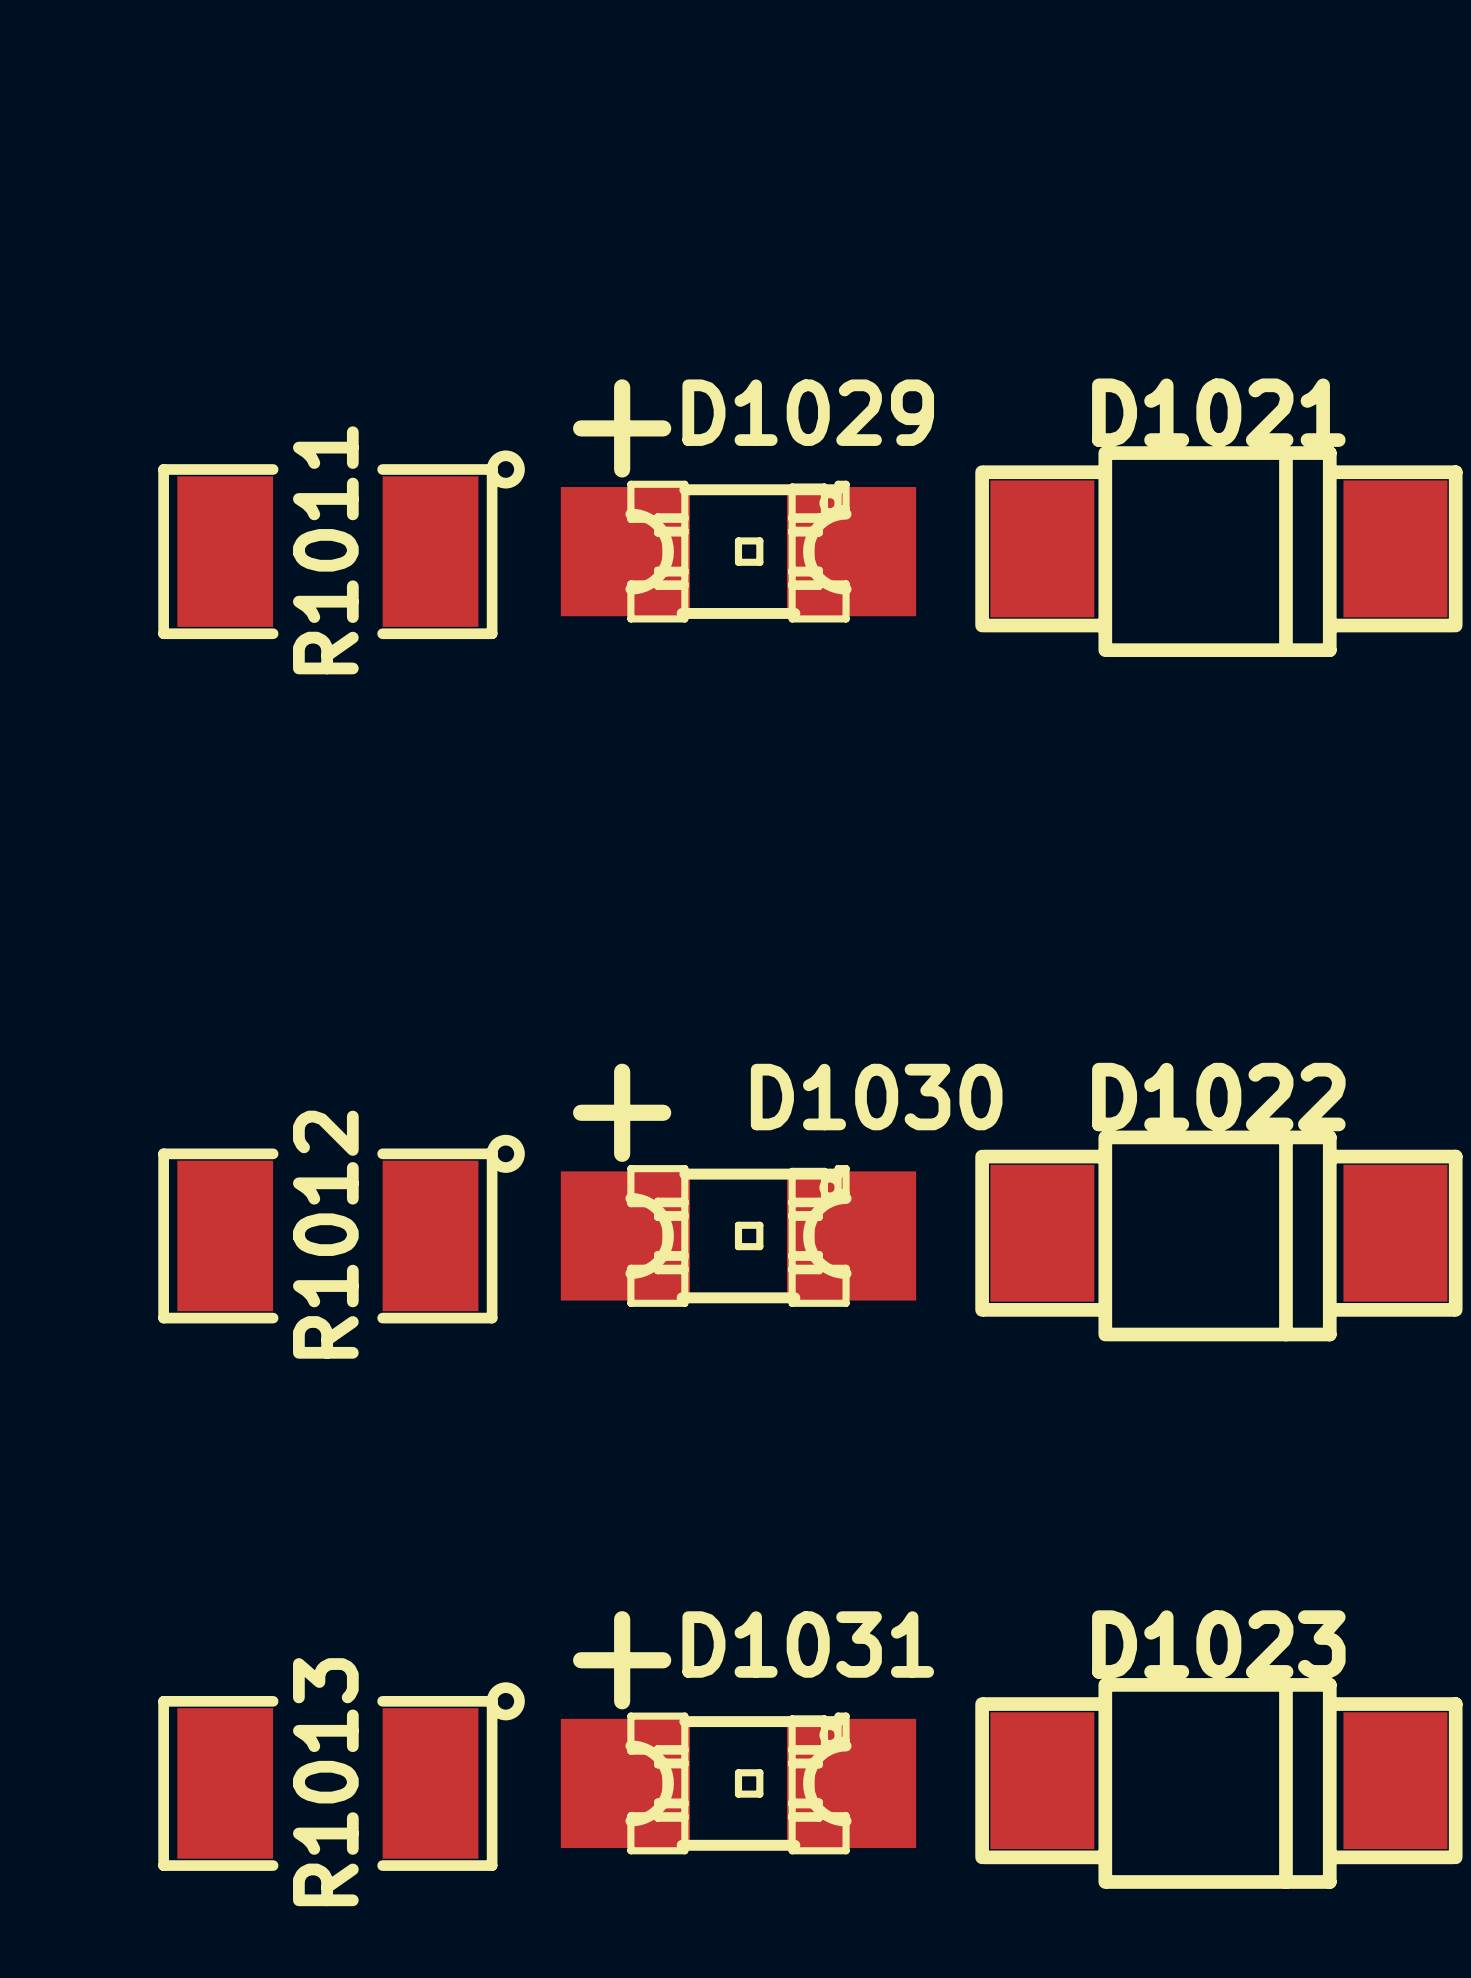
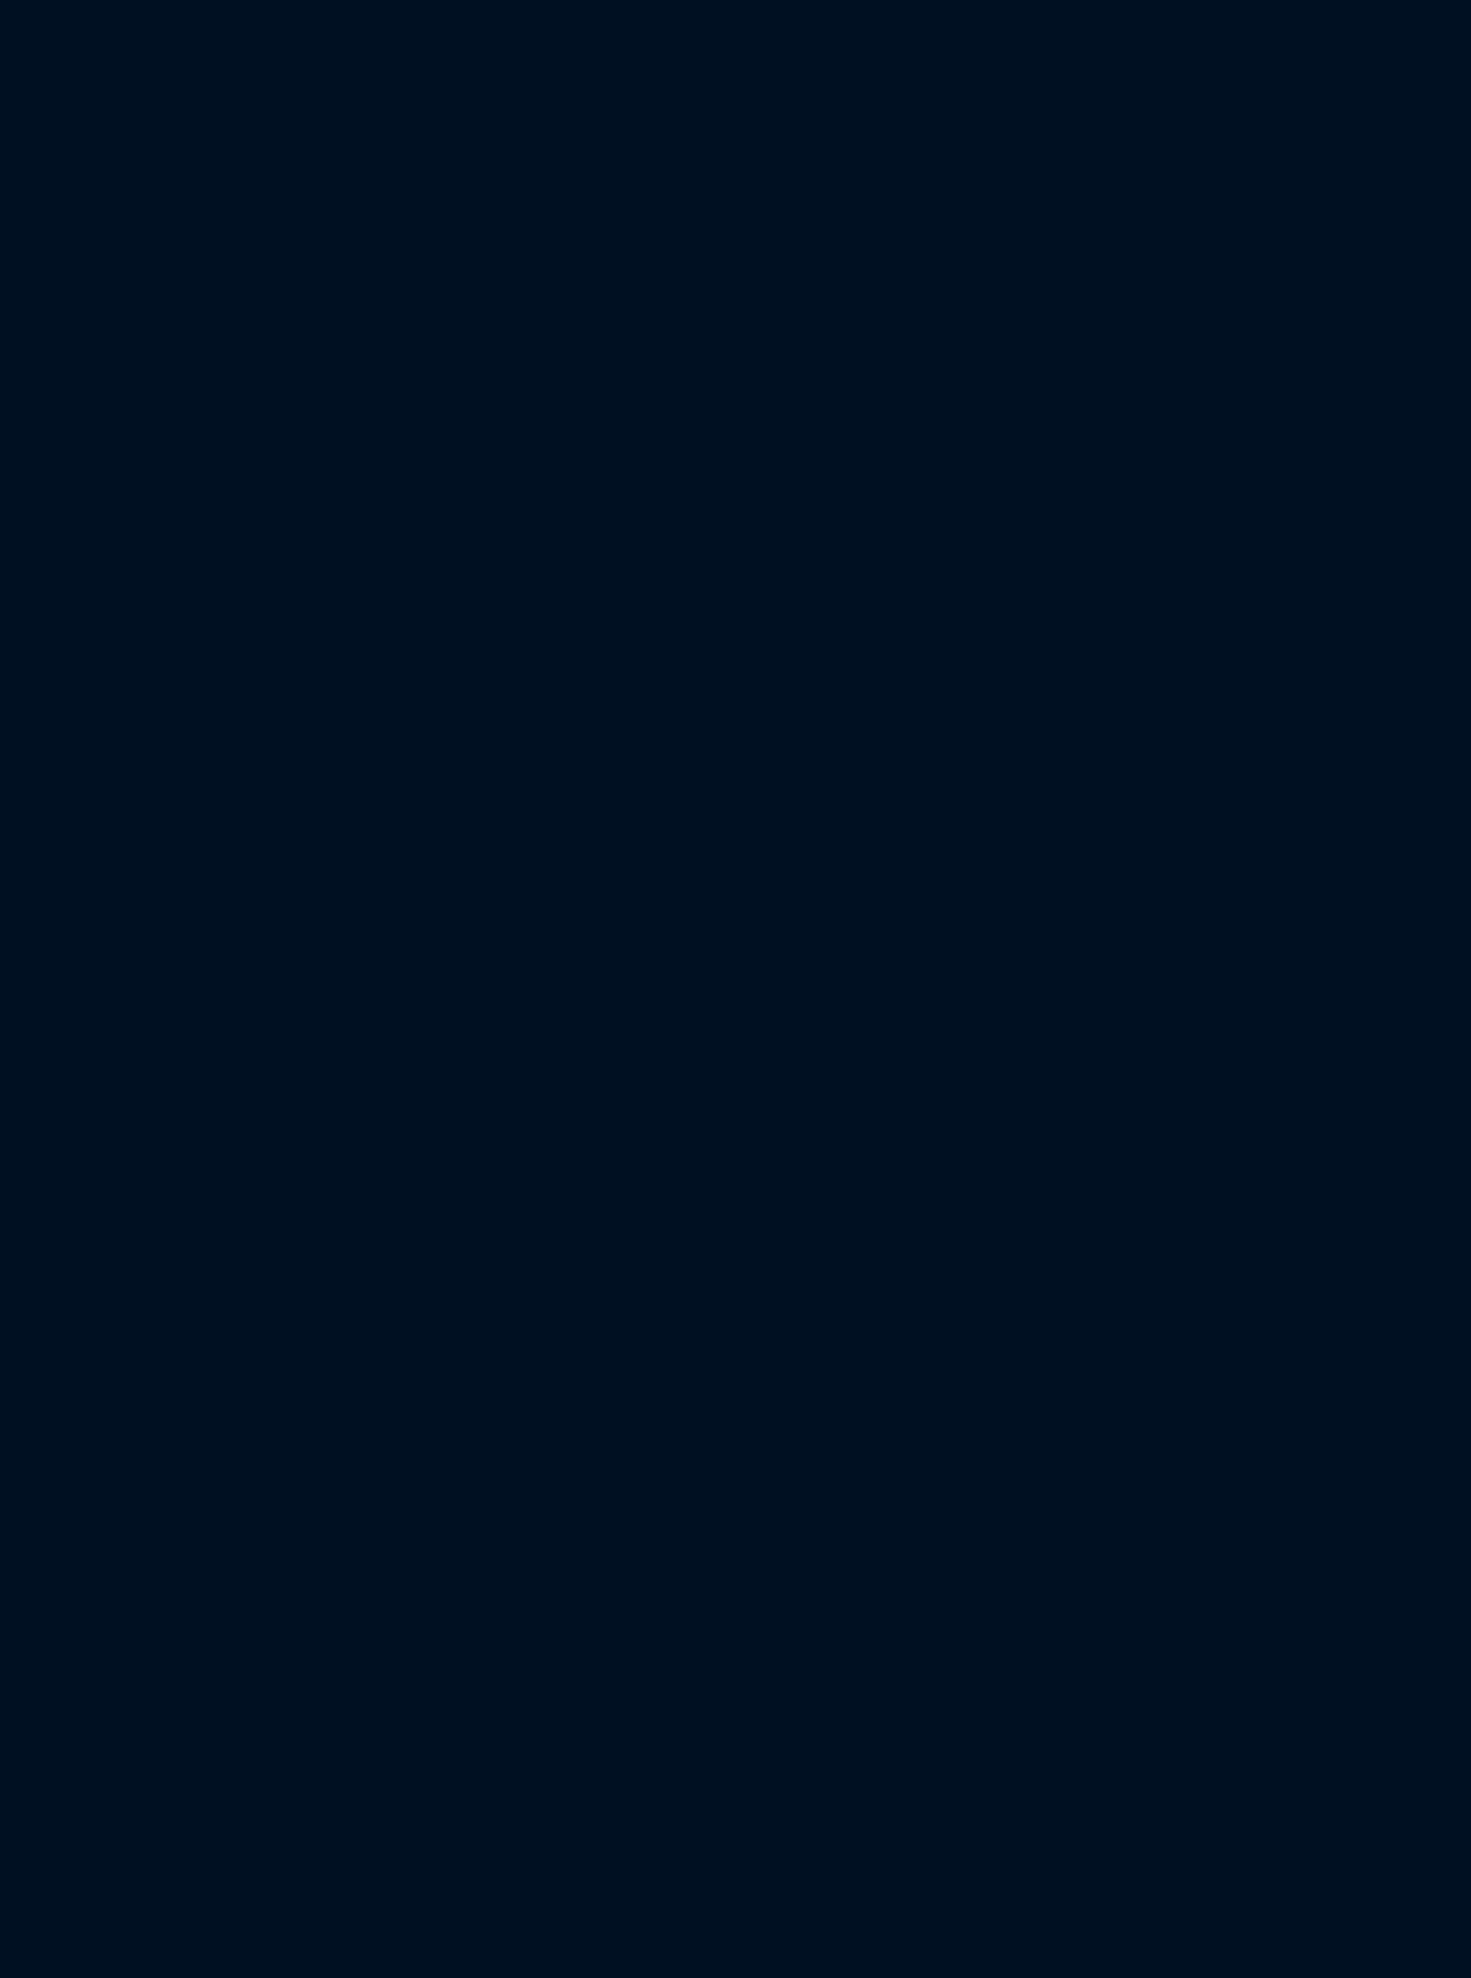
D1029: (738, 500) -> none
R1011: (341, 544) -> none
D1021: (1218, 551) -> none
D1030: (738, 1185) -> none
R1012: (341, 1229) -> none
D1022: (1218, 1235) -> none
D1031: (738, 1732) -> none
R1013: (341, 1776) -> none
D1023: (1218, 1783) -> none

